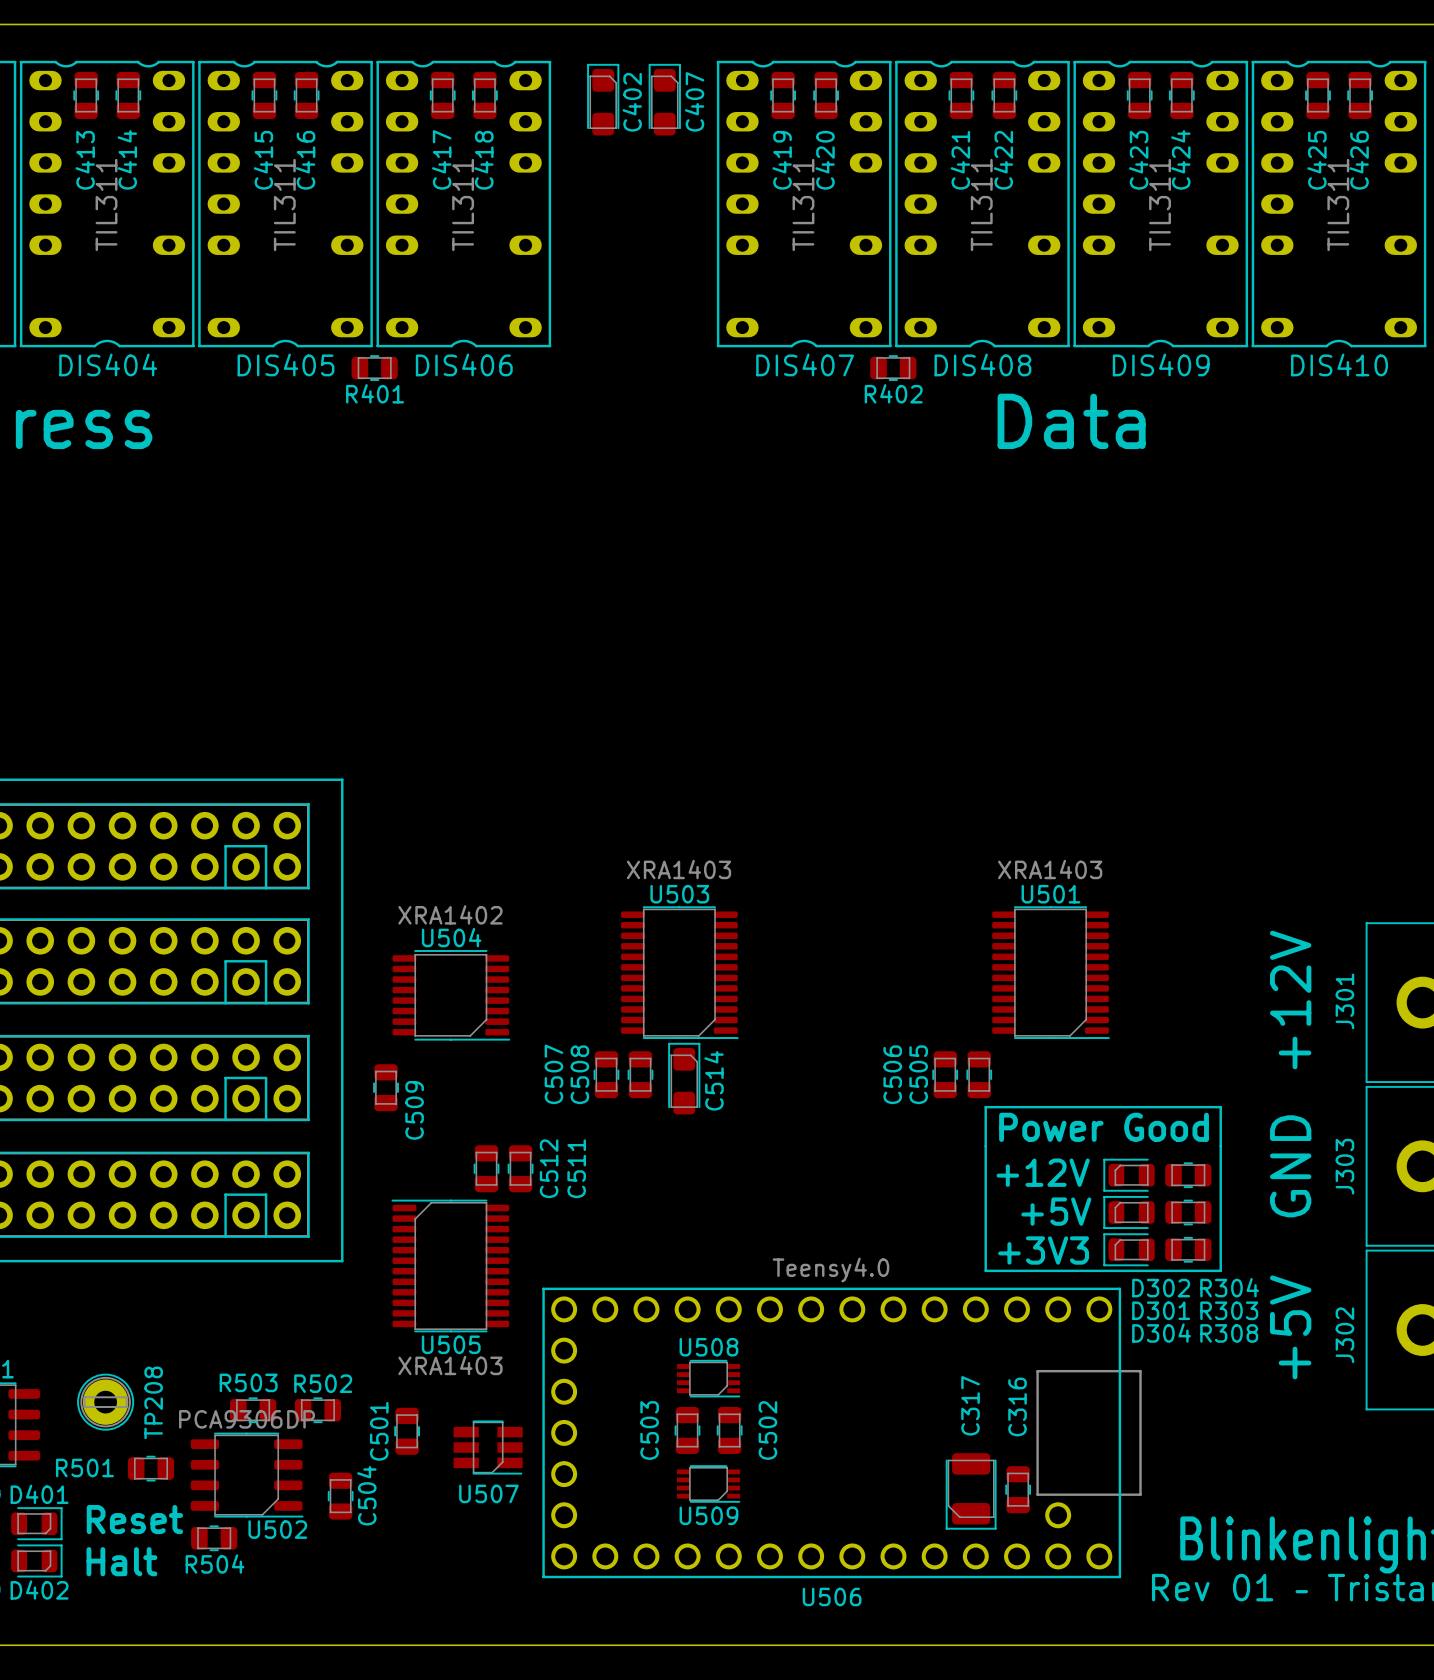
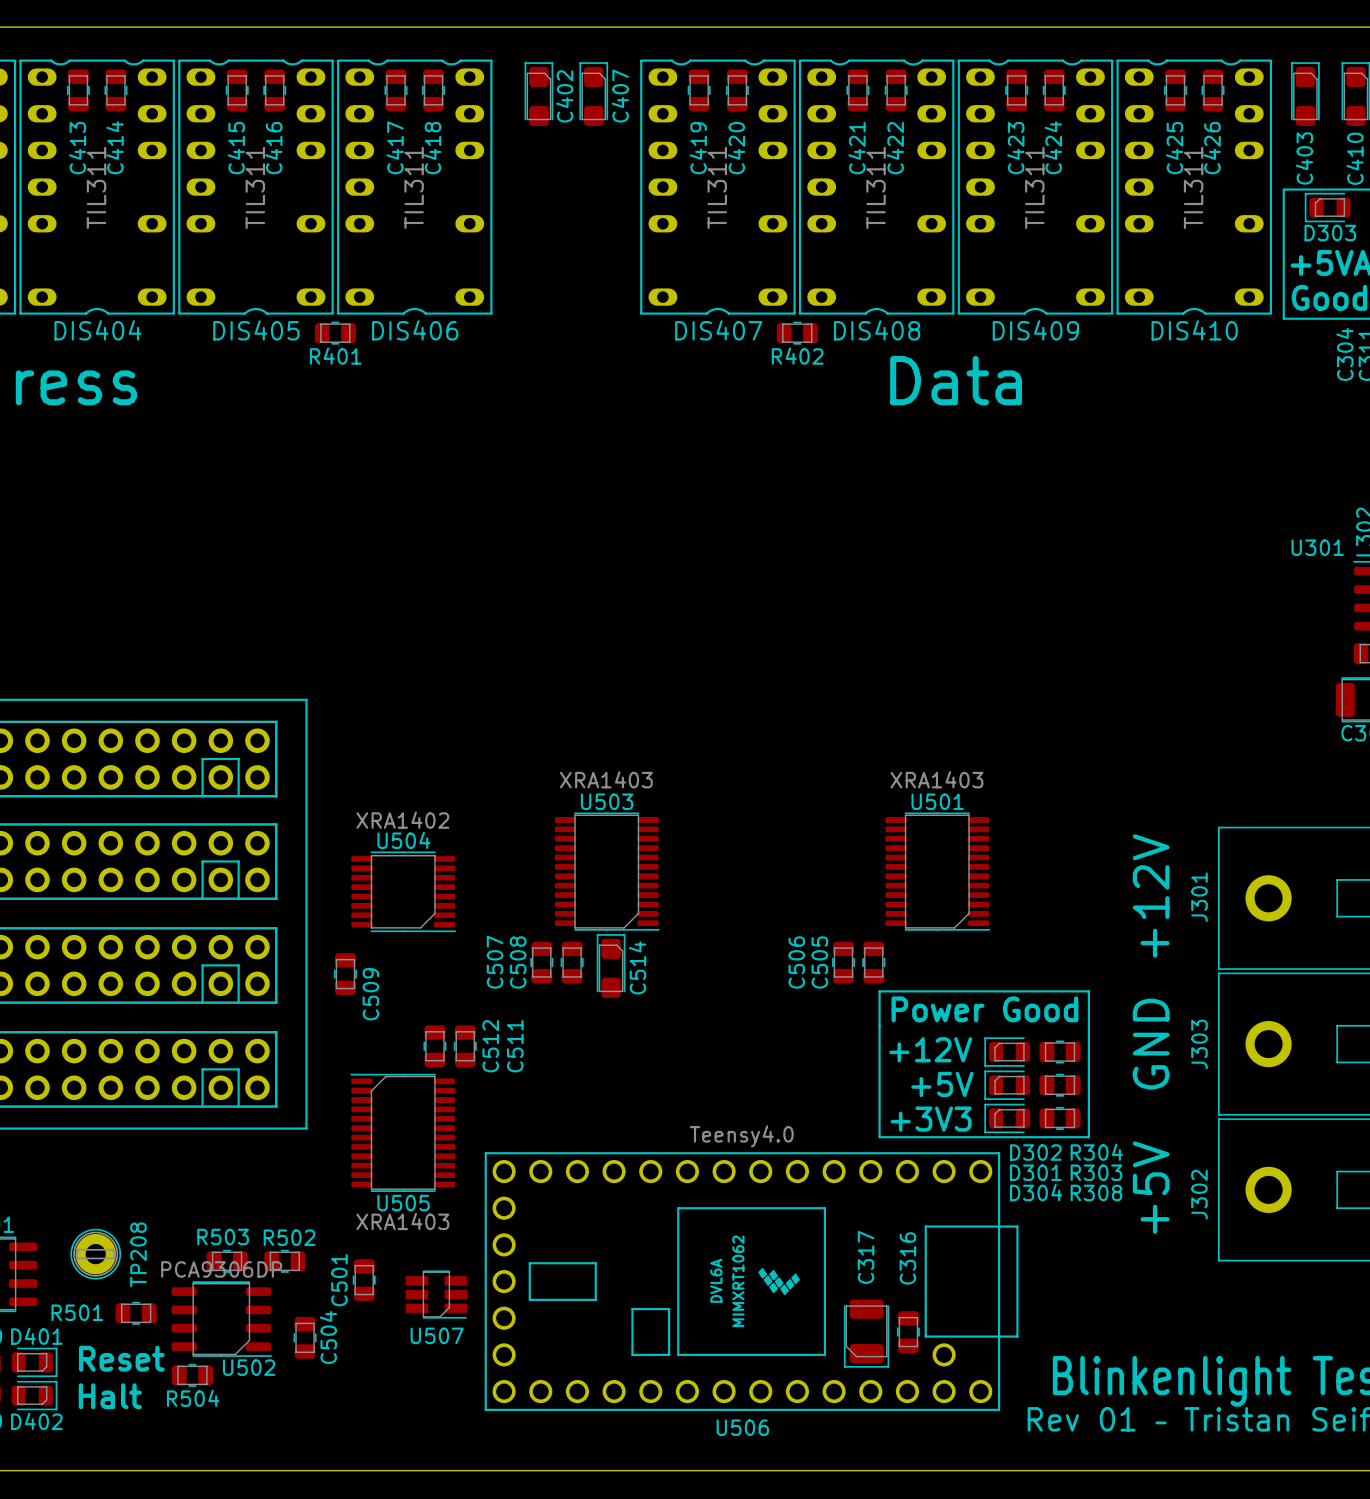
U506 footprint: [542, 1287, 1142, 1579] -> [484, 1152, 1019, 1411]
U508: (708, 1378) -> none
C503: (687, 1430) -> none
C502: (729, 1430) -> none
U509: (708, 1483) -> none

